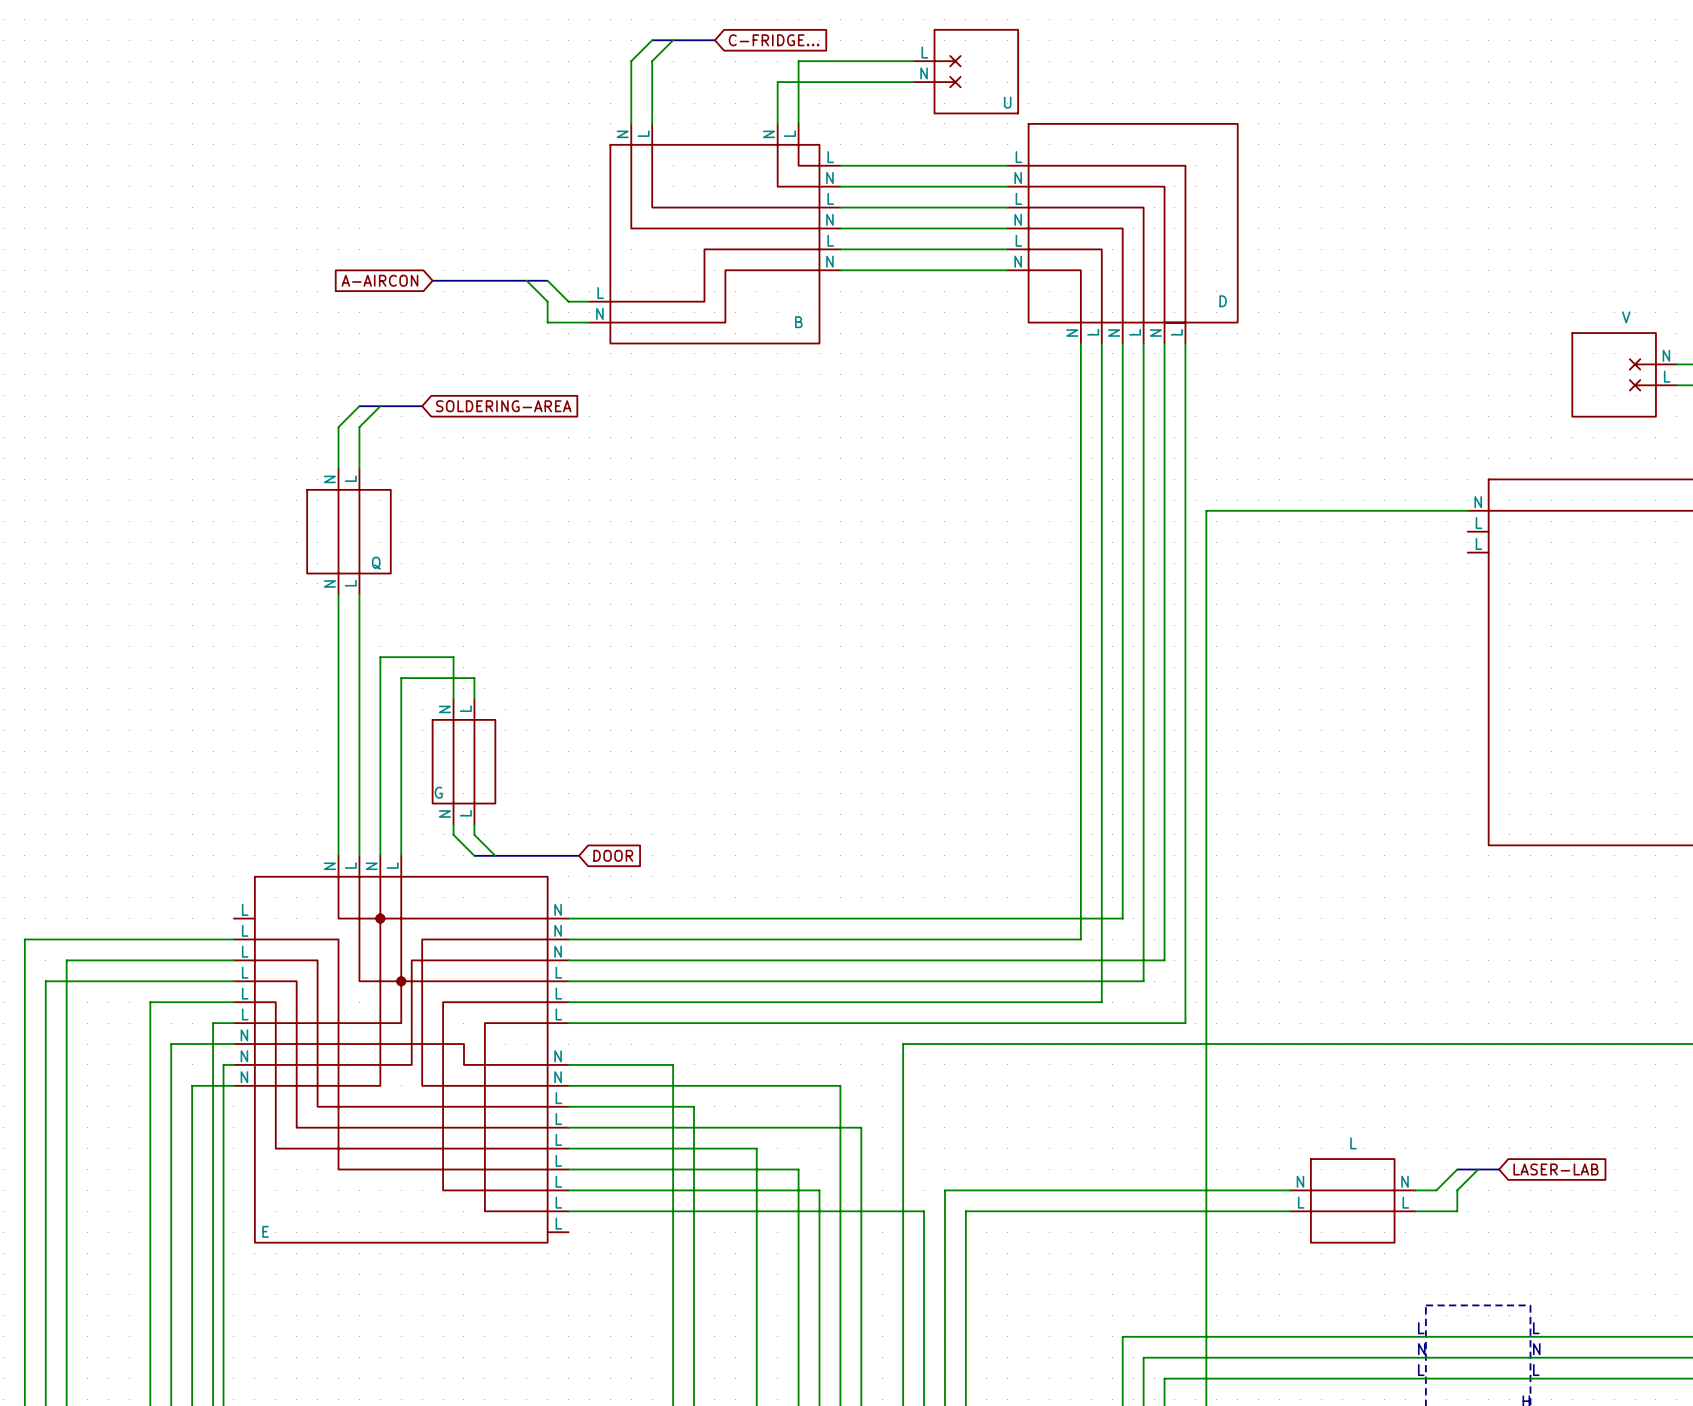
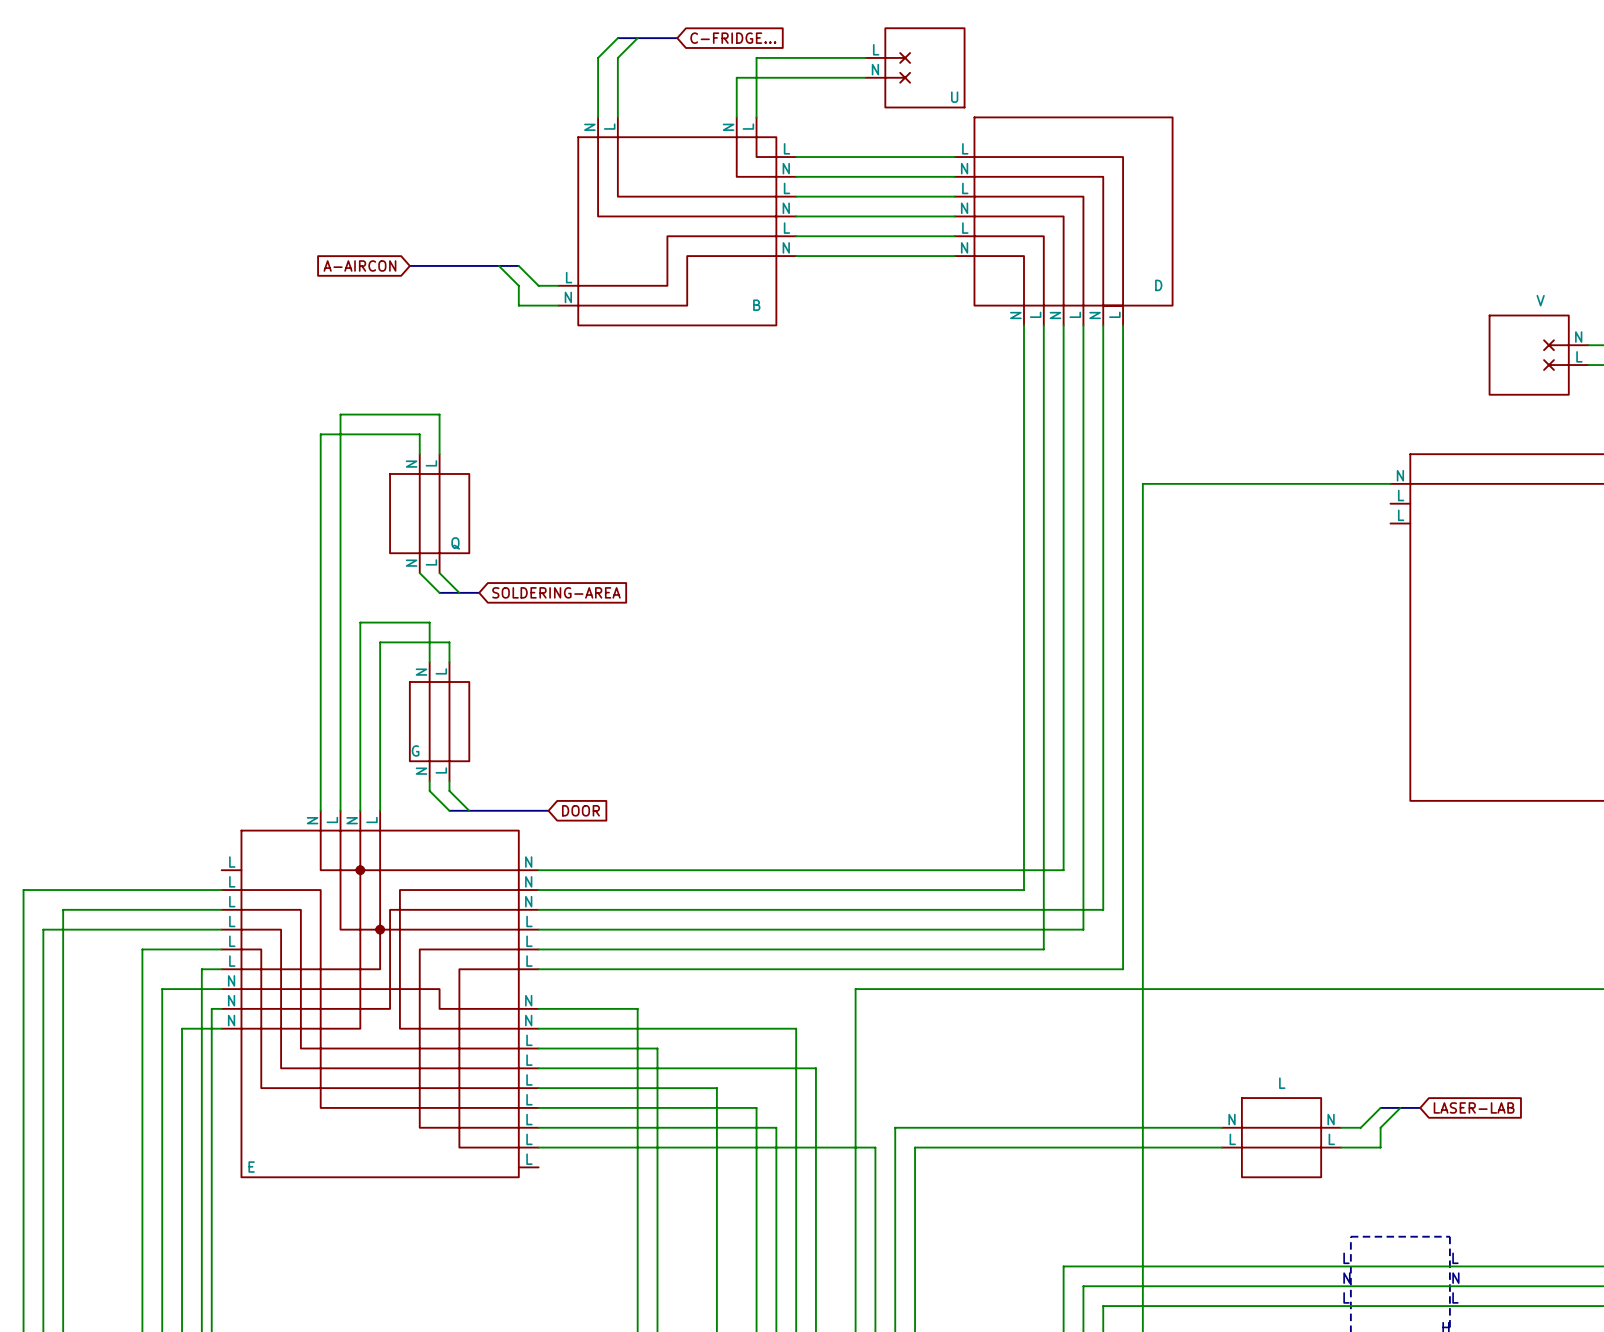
wire: (359, 406) (338, 427) (338, 458) -> (419, 454) (419, 434) (320, 434)
bus: (359, 406) (422, 406) -> none
wire: (380, 406) (359, 427) (359, 437) -> (439, 454) (439, 414) (340, 414)
global label: SOLDERING-AREA (503, 406) -> none
part position: (348, 531) -> (429, 513)
wire: none -> (419, 573) (439, 592)
wire: none -> (439, 573) (459, 592)
bus: none -> (439, 592) (479, 592)
global label: none -> SOLDERING-AREA (556, 592)

